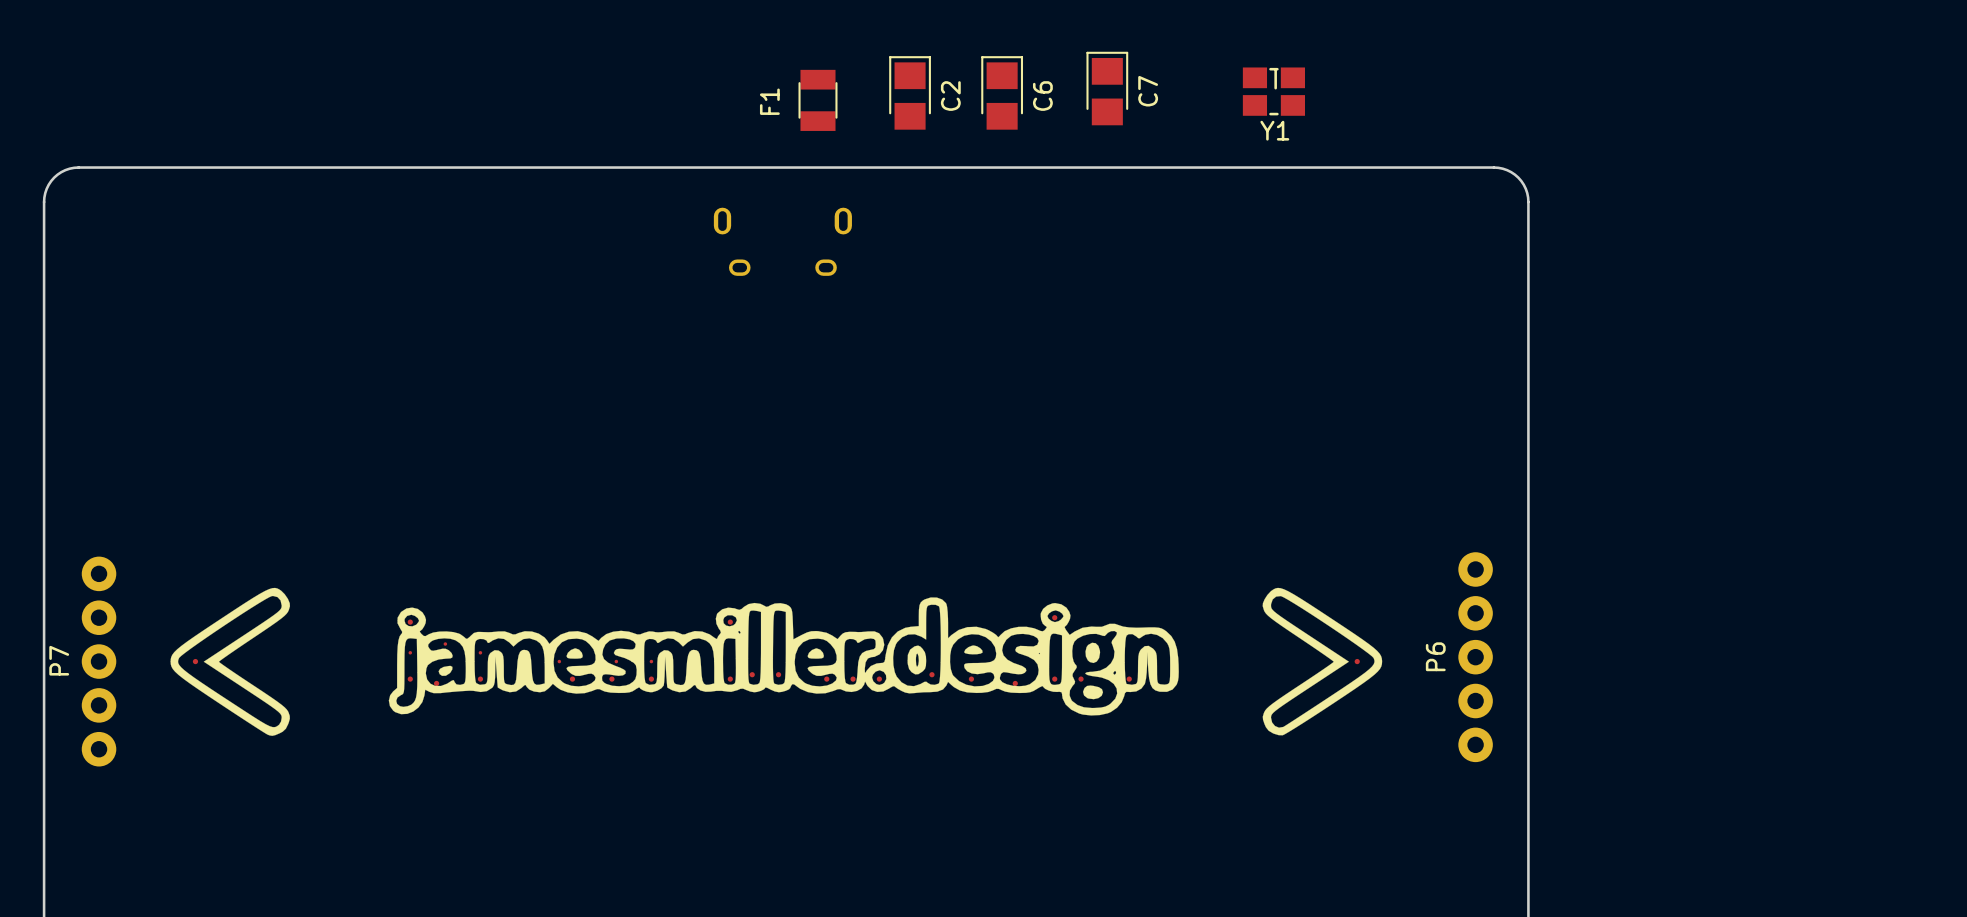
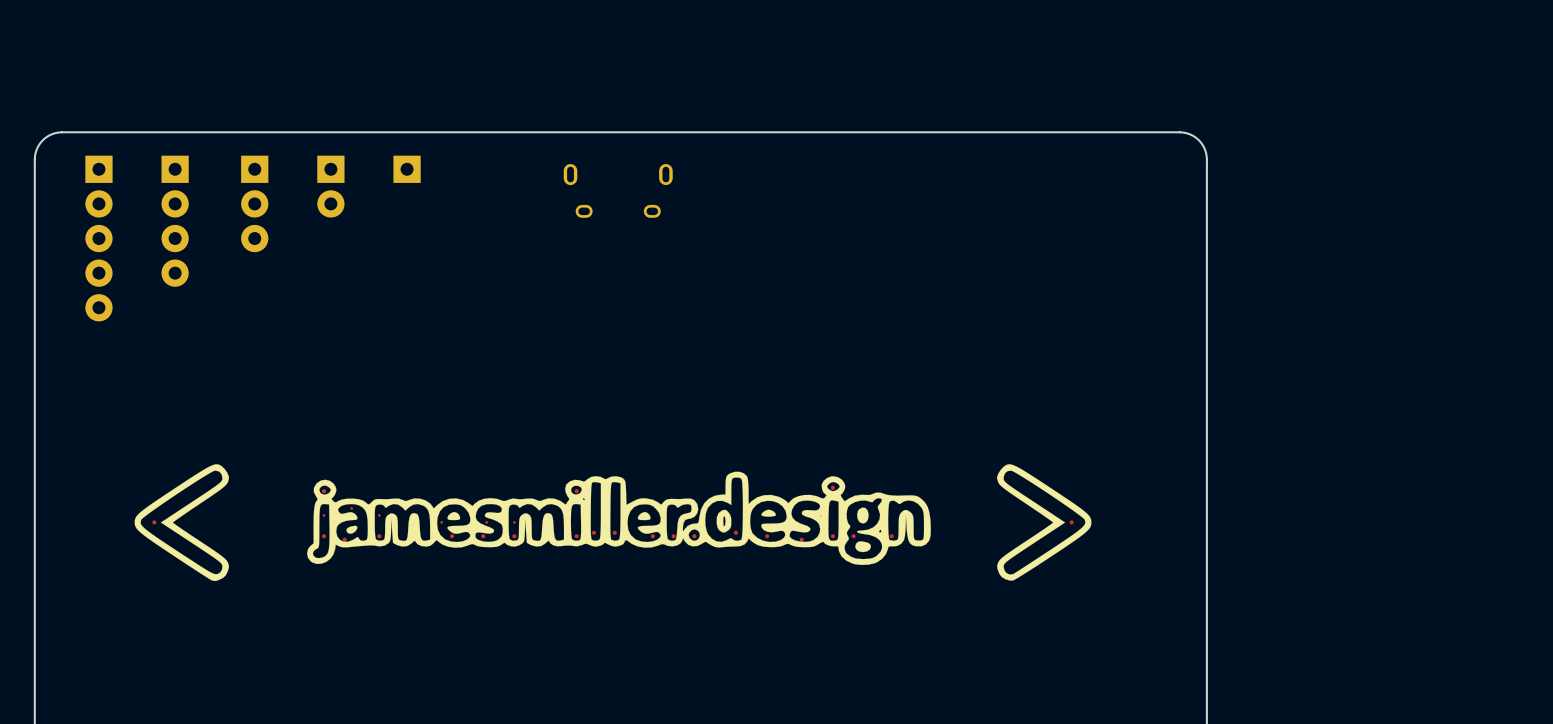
C7: (1107, 88) -> none
Y1: (1273, 91) -> none
C2: (910, 92) -> none
C6: (1002, 92) -> none
F1: (817, 100) -> none
part: none -> (407, 169)
part: none -> (330, 186)
part: none -> (254, 203)
part: none -> (175, 221)
part: none -> (98, 238)
P6: (1475, 657) -> none
P7: (99, 661) -> none

